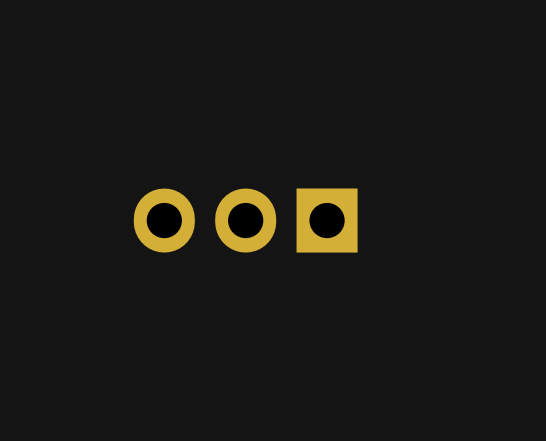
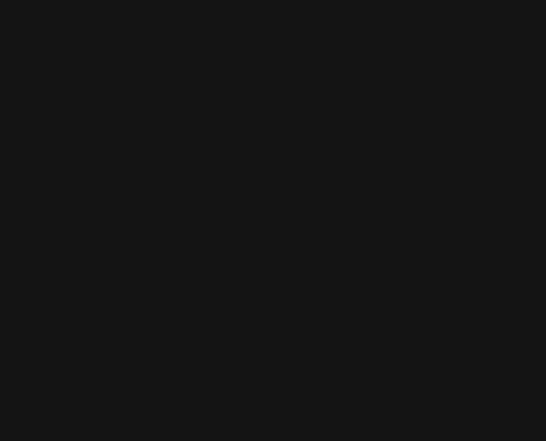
part: (245, 220) -> none

